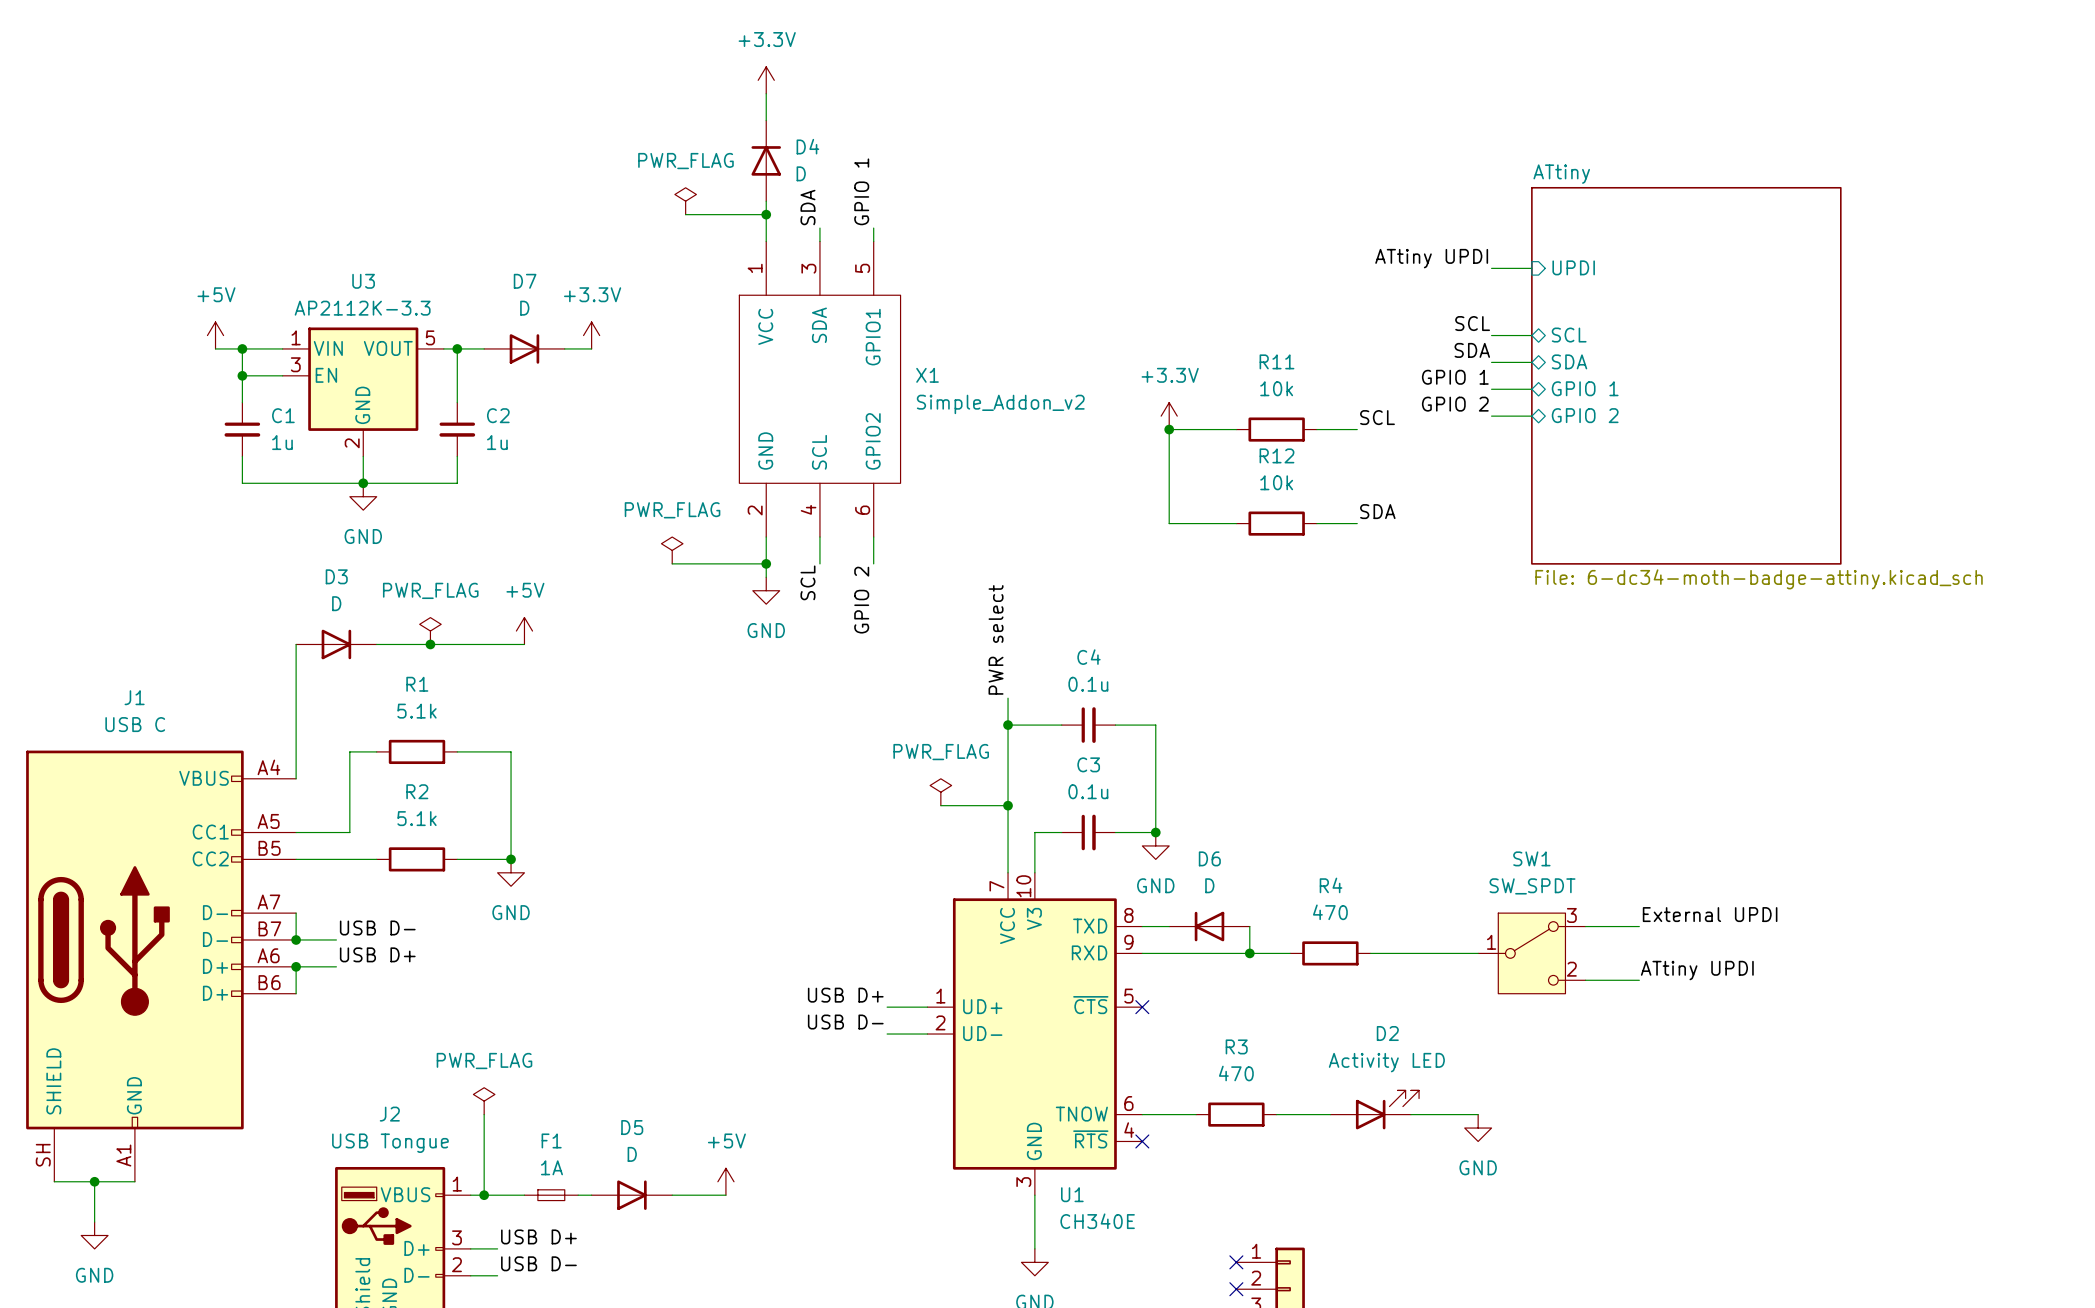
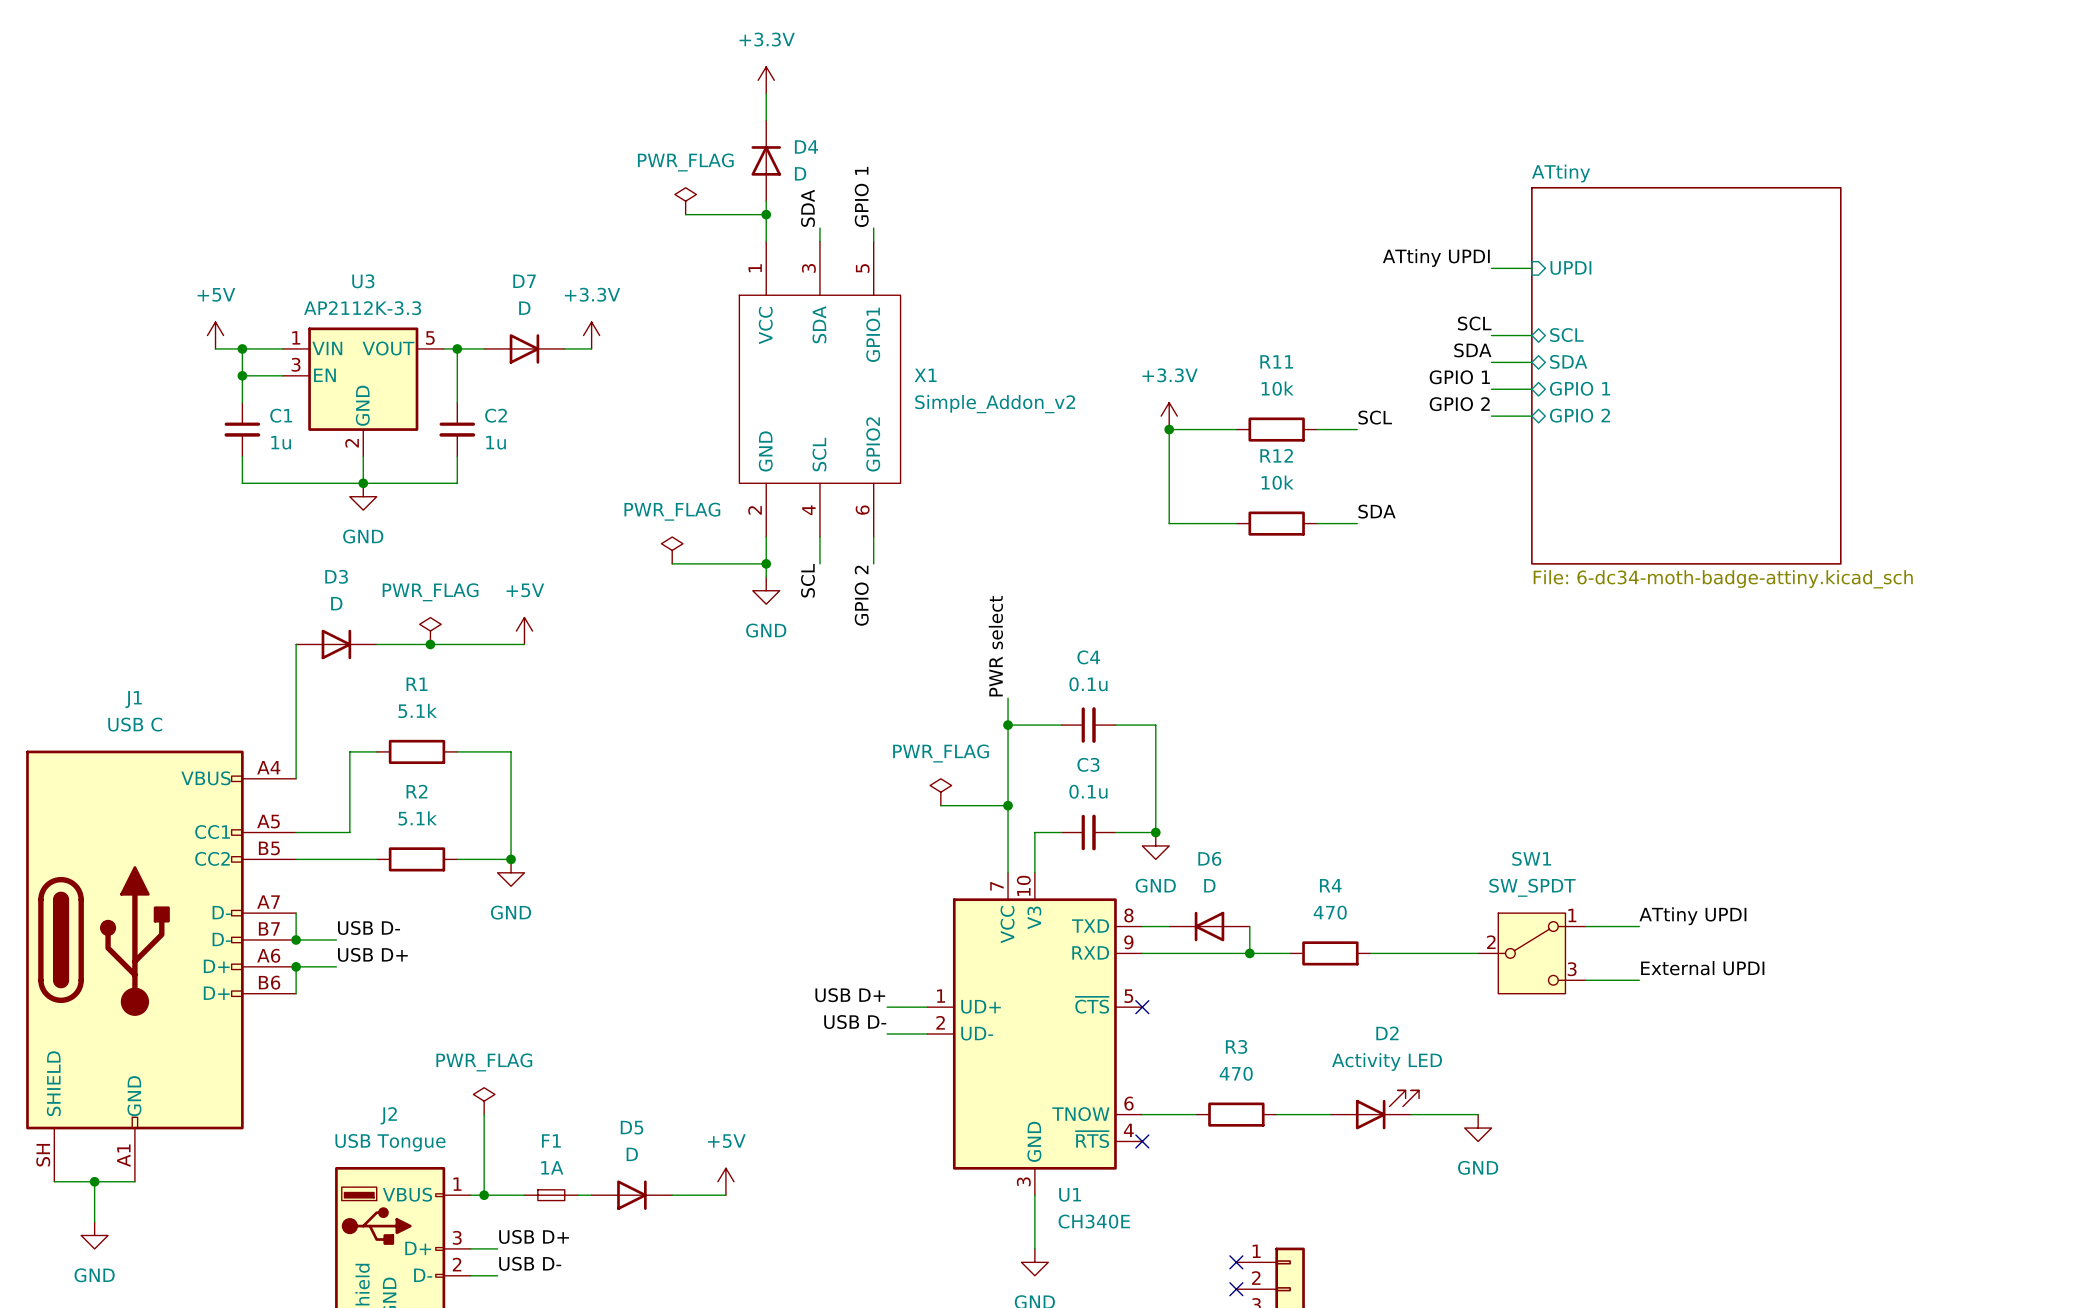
label: External UPDI (1710, 914) -> ATtiny UPDI (1692, 916)
SW1 pin number: 3 (1571, 915) -> 1 (1572, 915)
SW1 pin number: 1 (1491, 942) -> 2 (1491, 942)
SW1 pin number: 2 (1571, 969) -> 3 (1572, 969)
label: ATtiny UPDI (1697, 970) -> External UPDI (1702, 968)

